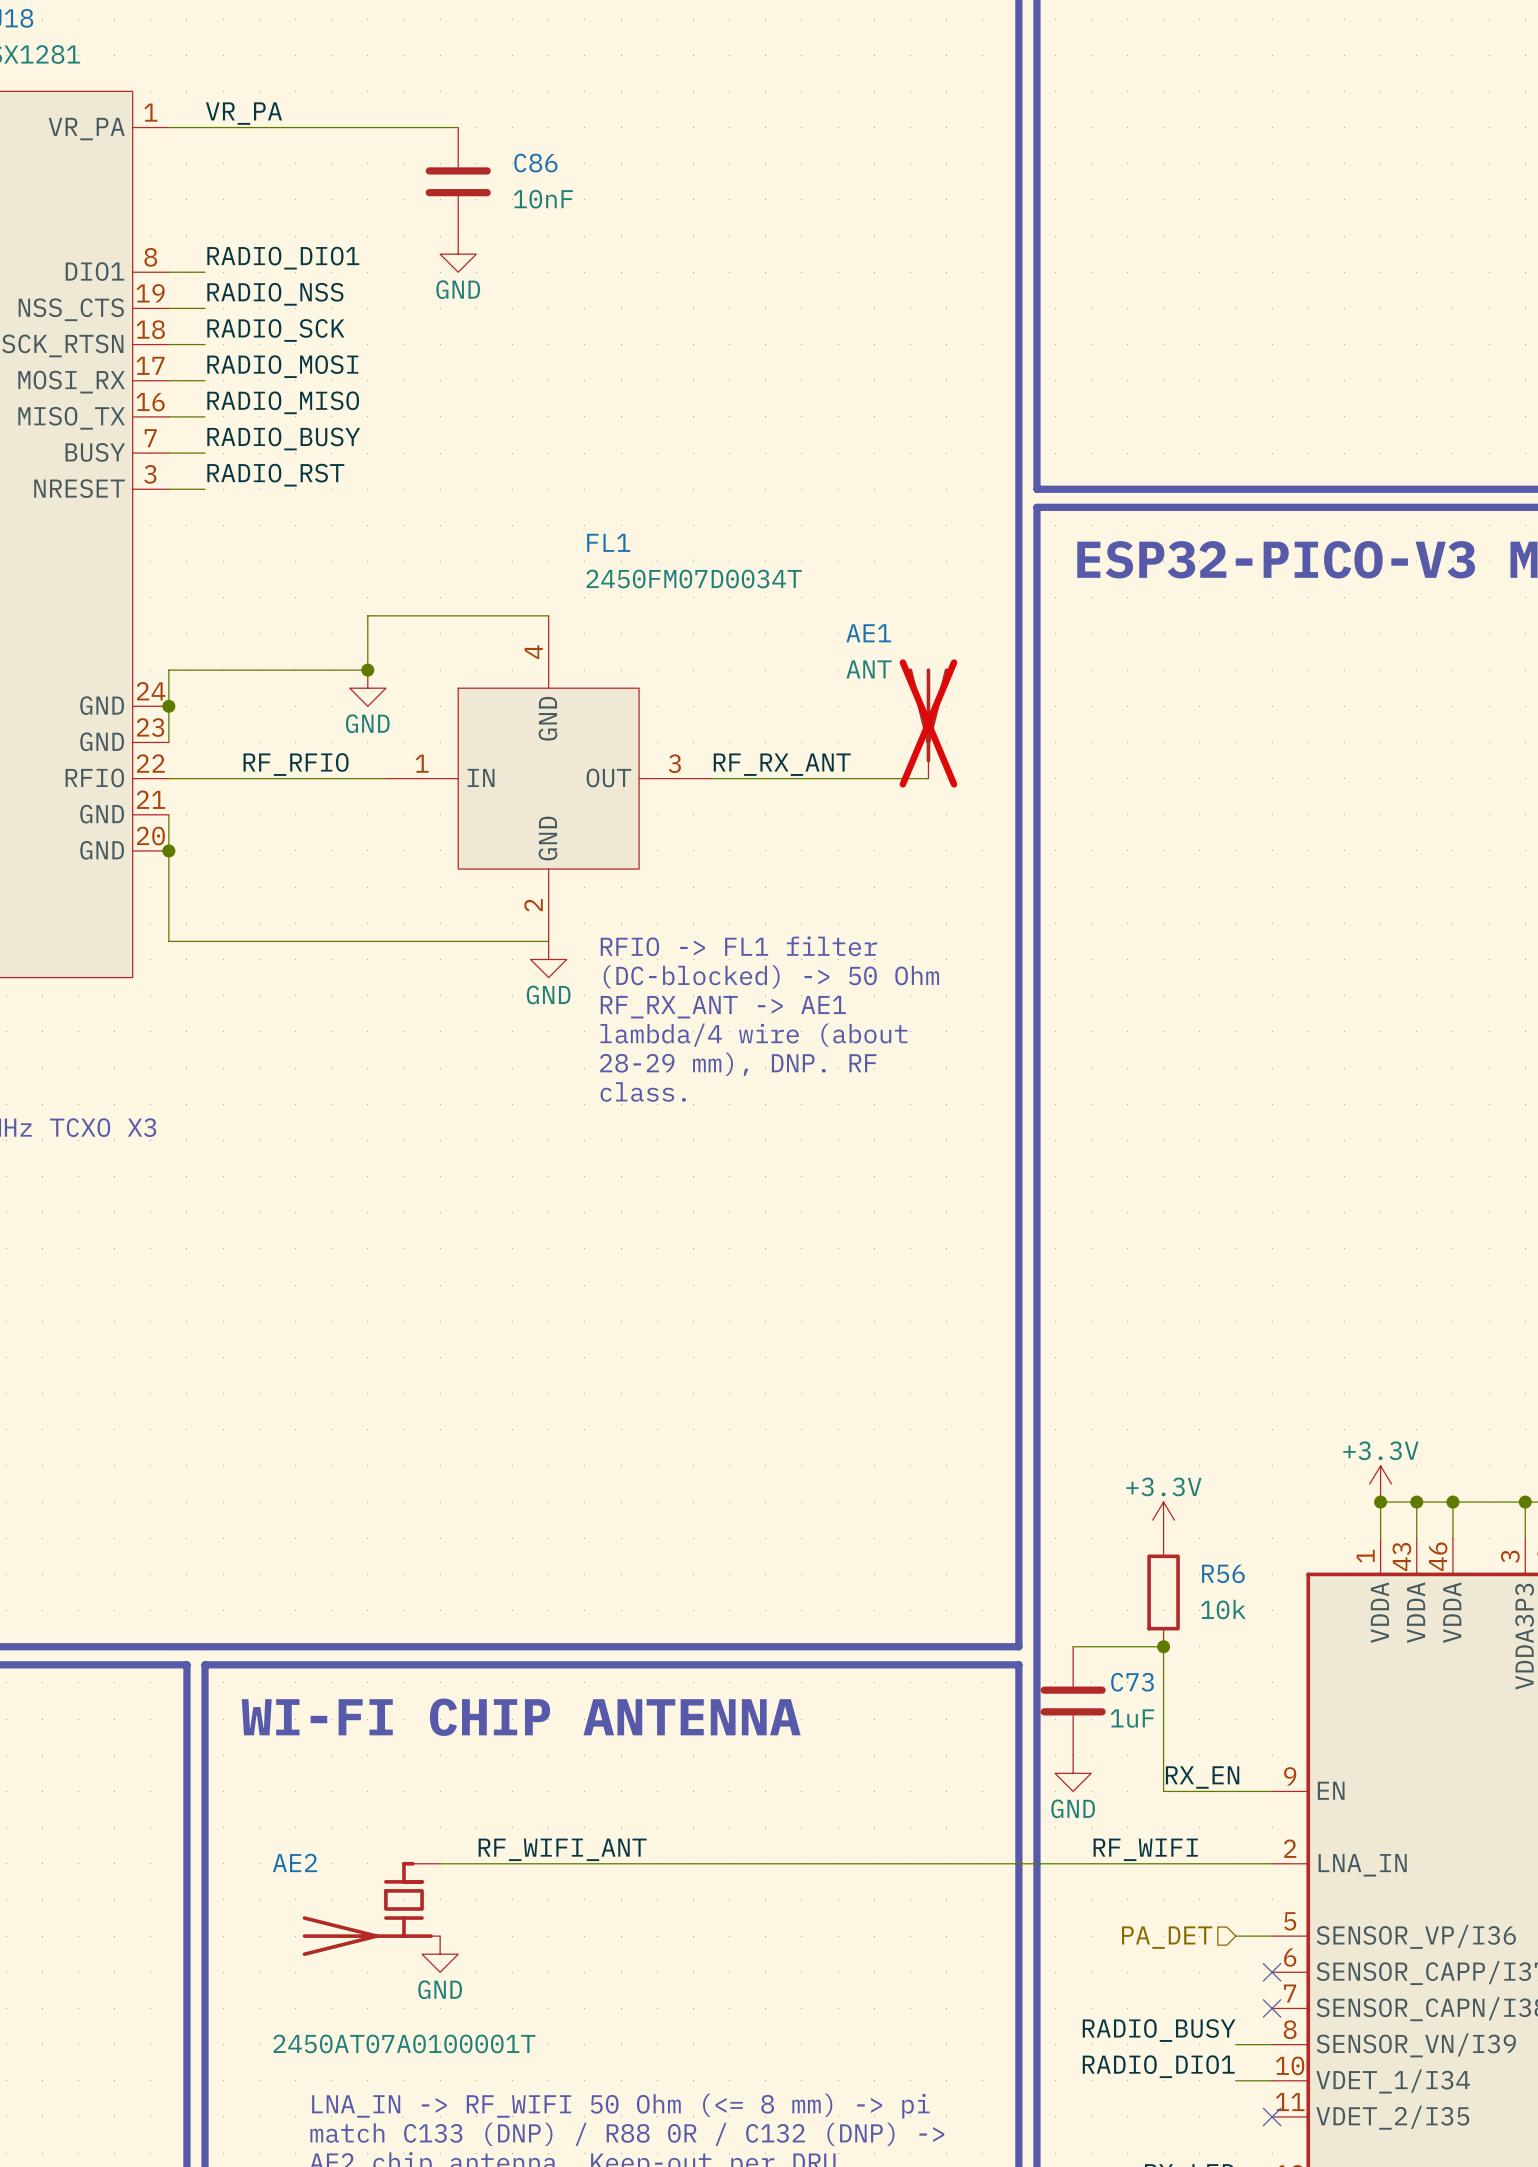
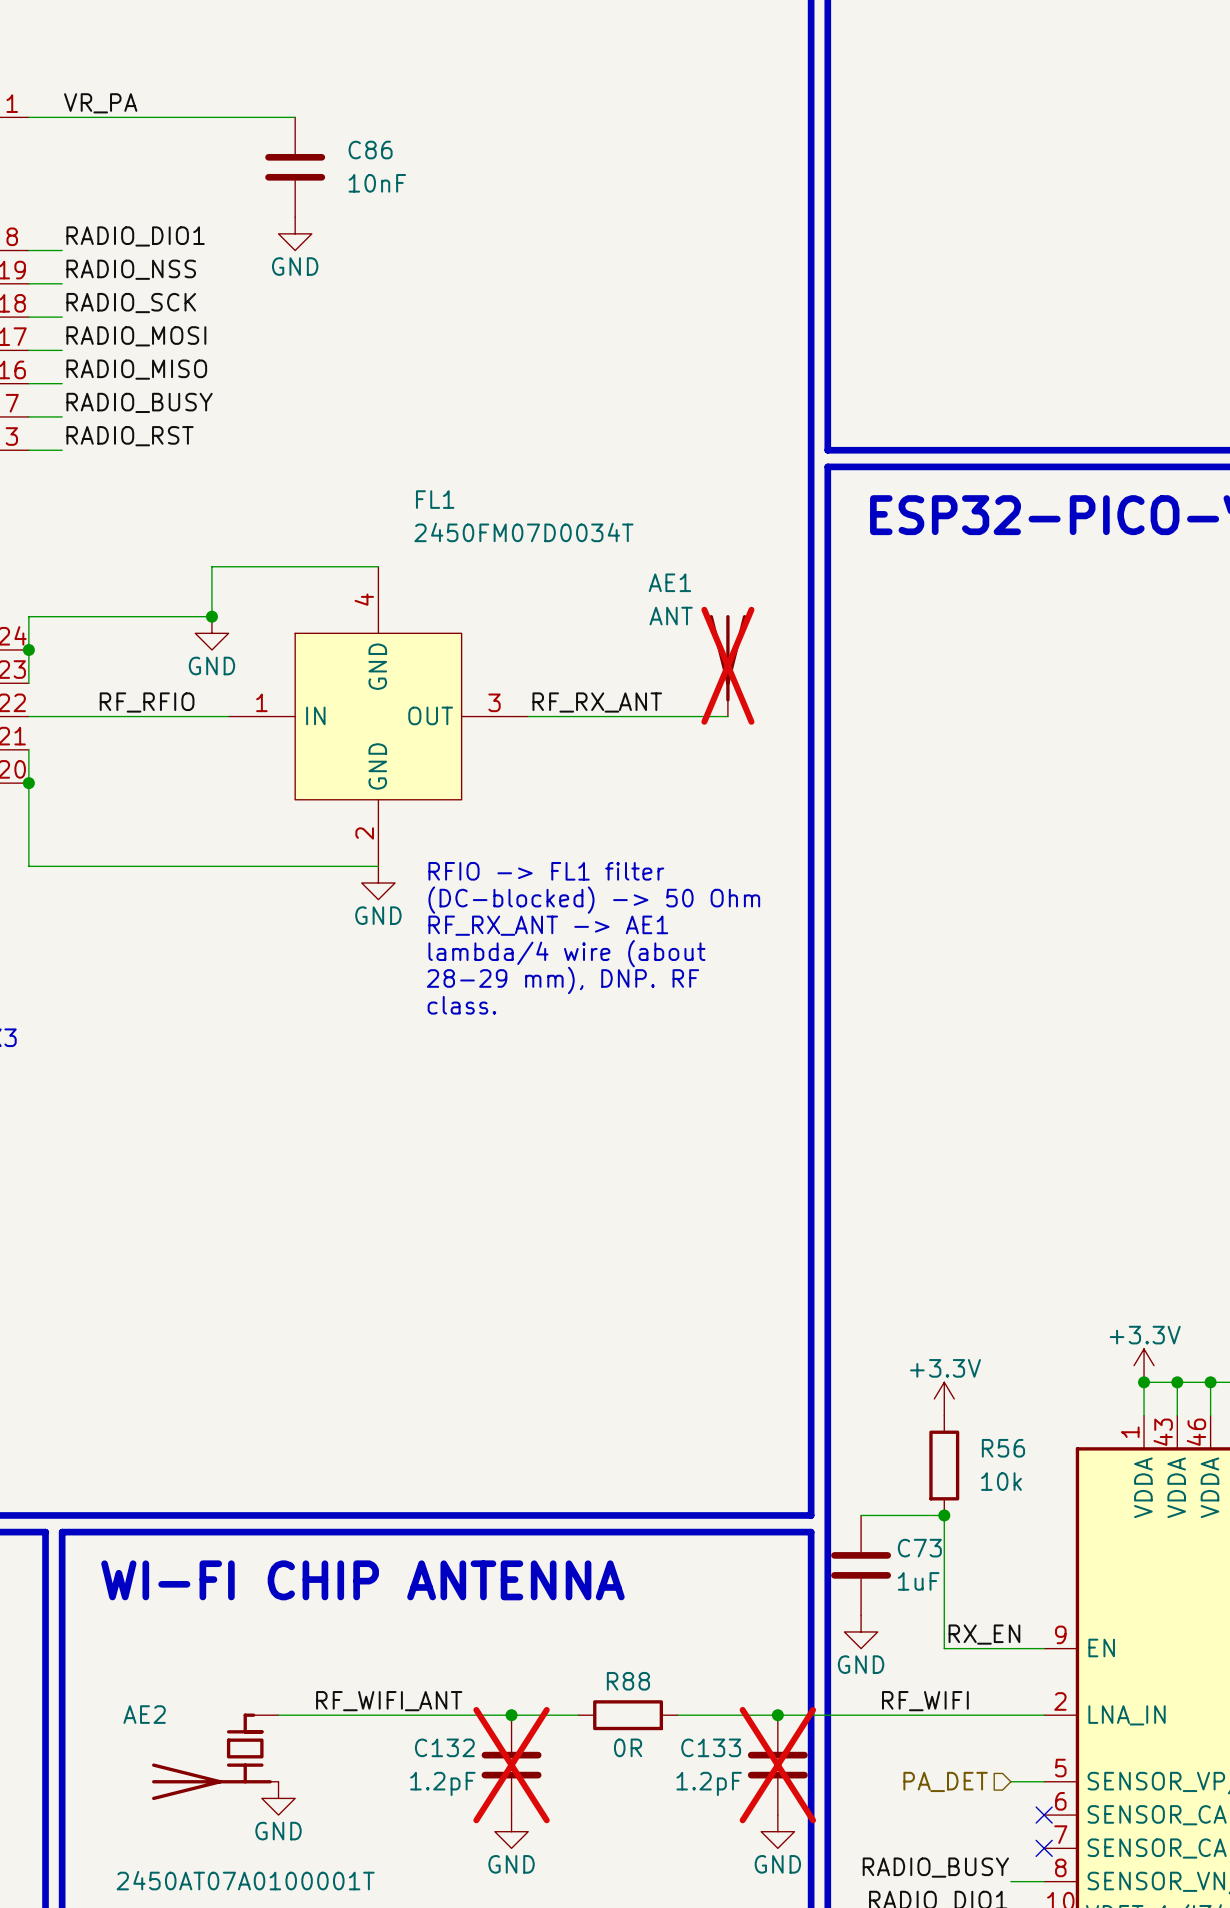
junction: none -> (511, 1715)
wire: (765, 1863) (874, 1863) -> none
R88: none -> 0R (628, 1715)
junction: none -> (777, 1715)
C132: none -> 1.2pF (511, 1765)
C133: none -> 1.2pF (777, 1765)
power symbol: none -> GND (511, 1831)
power symbol: none -> GND (777, 1831)

